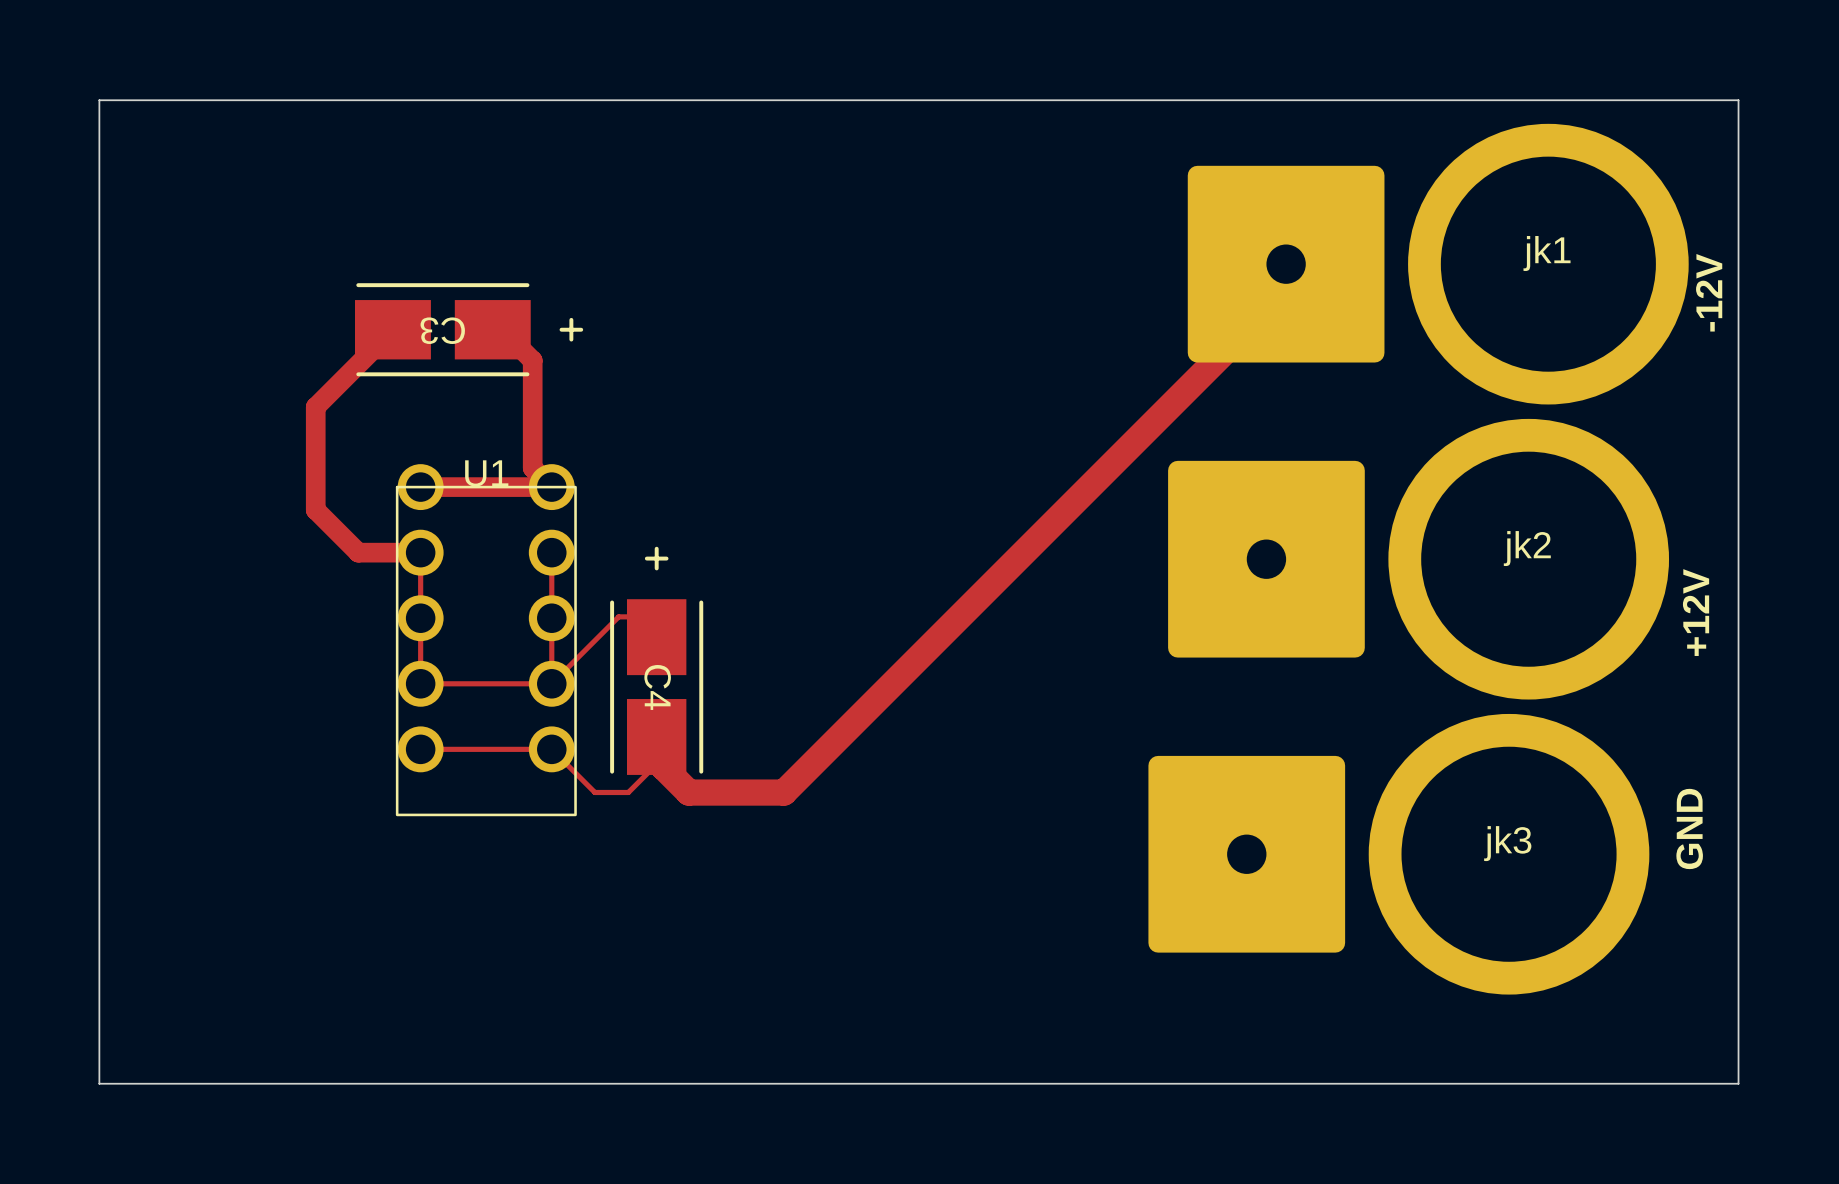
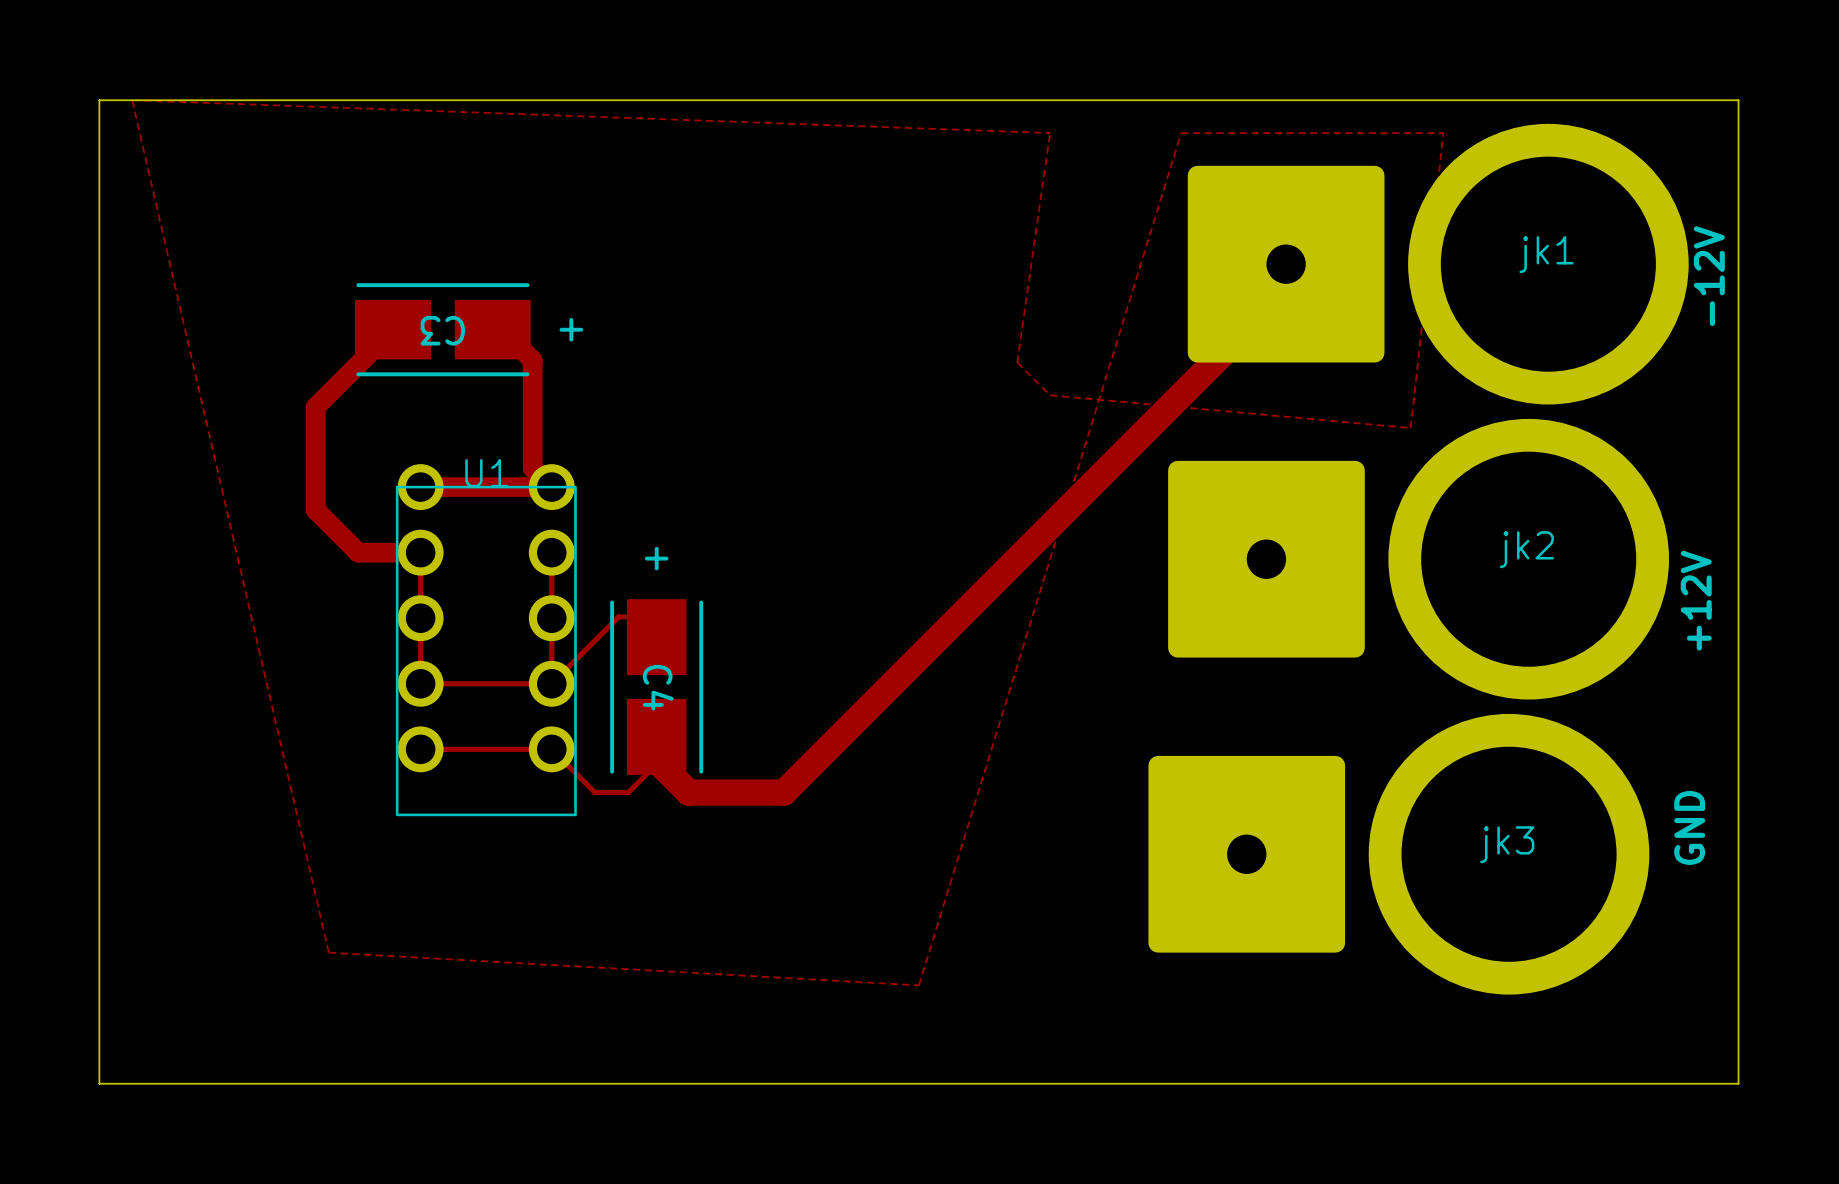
zone outline: none -> (132, 100) (1050, 133) (1017, 362) (1050, 395) (1410, 428) (1443, 133) (1181, 133) (918, 985) (328, 952) (132, 100)

